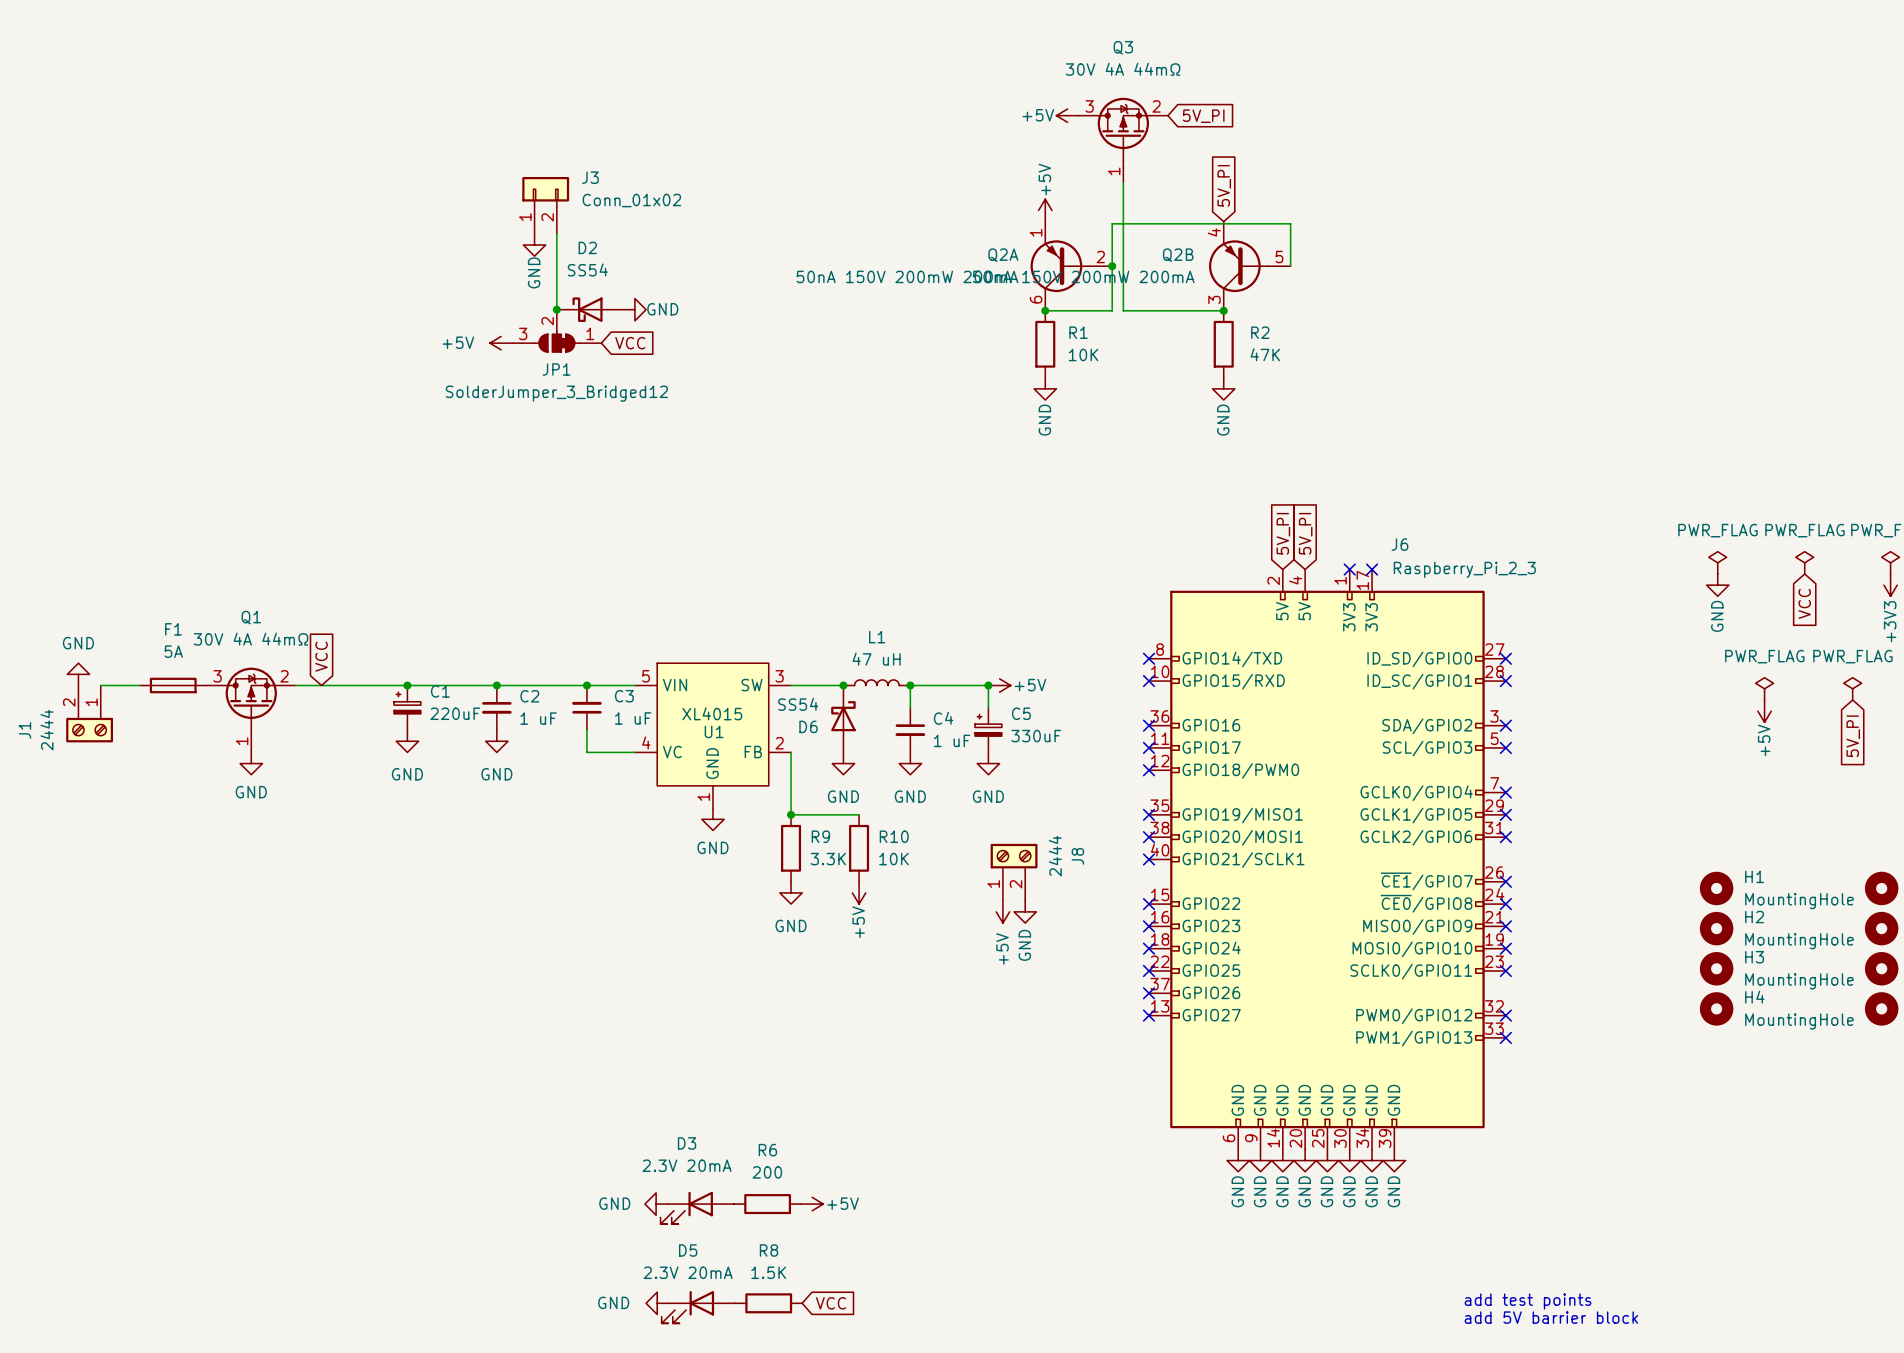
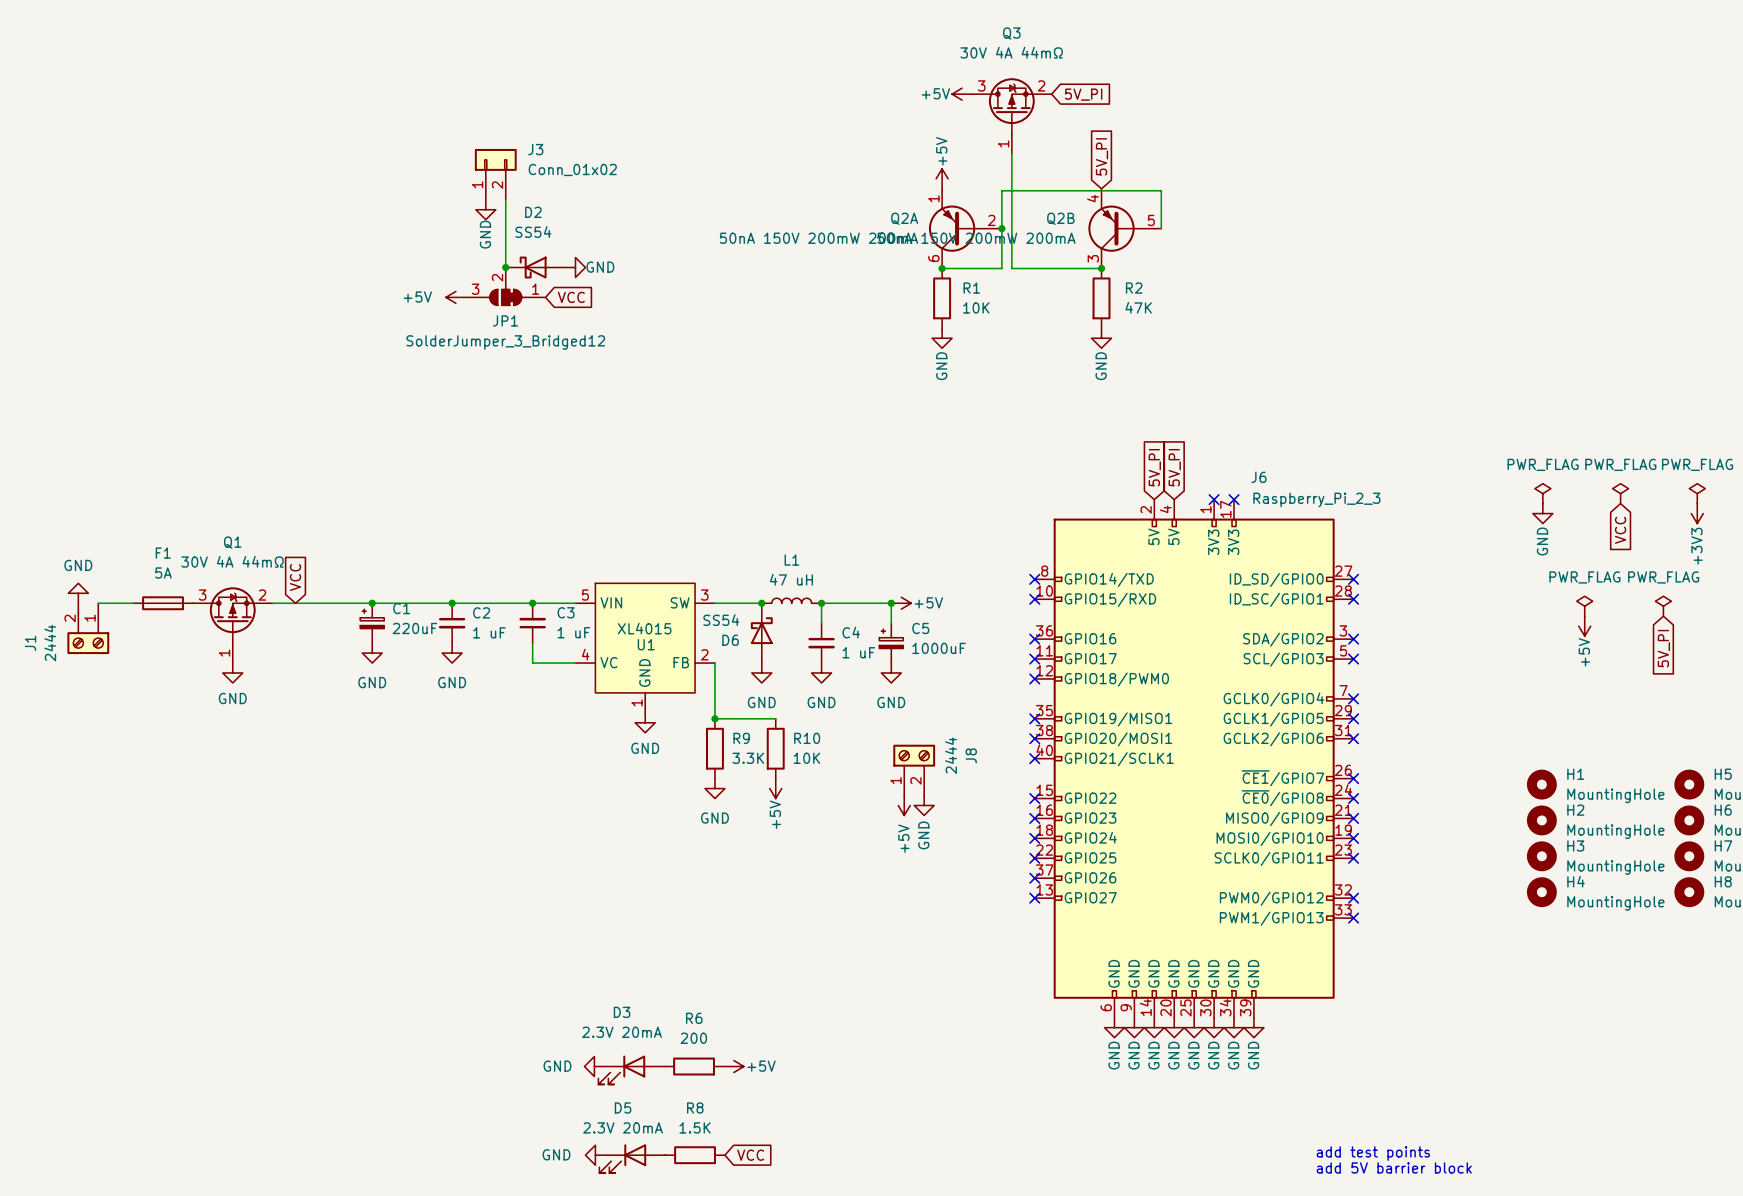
C5 value: 330uF (1036, 736) -> 1000uF (939, 648)

